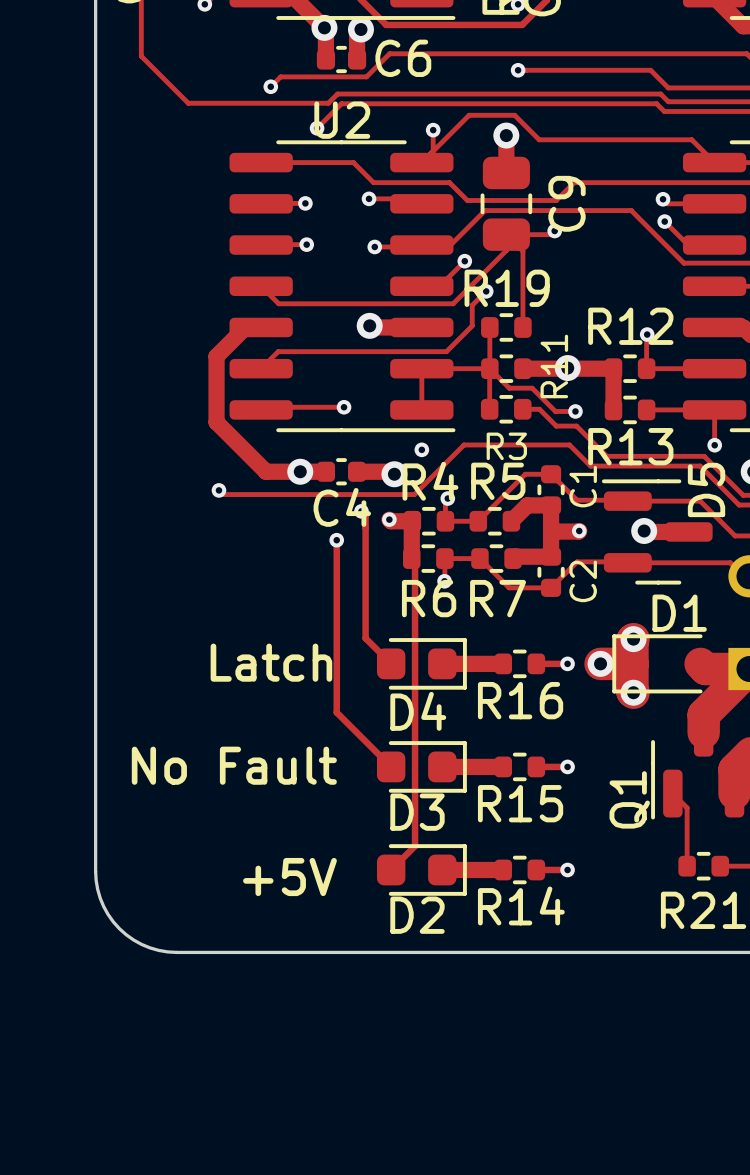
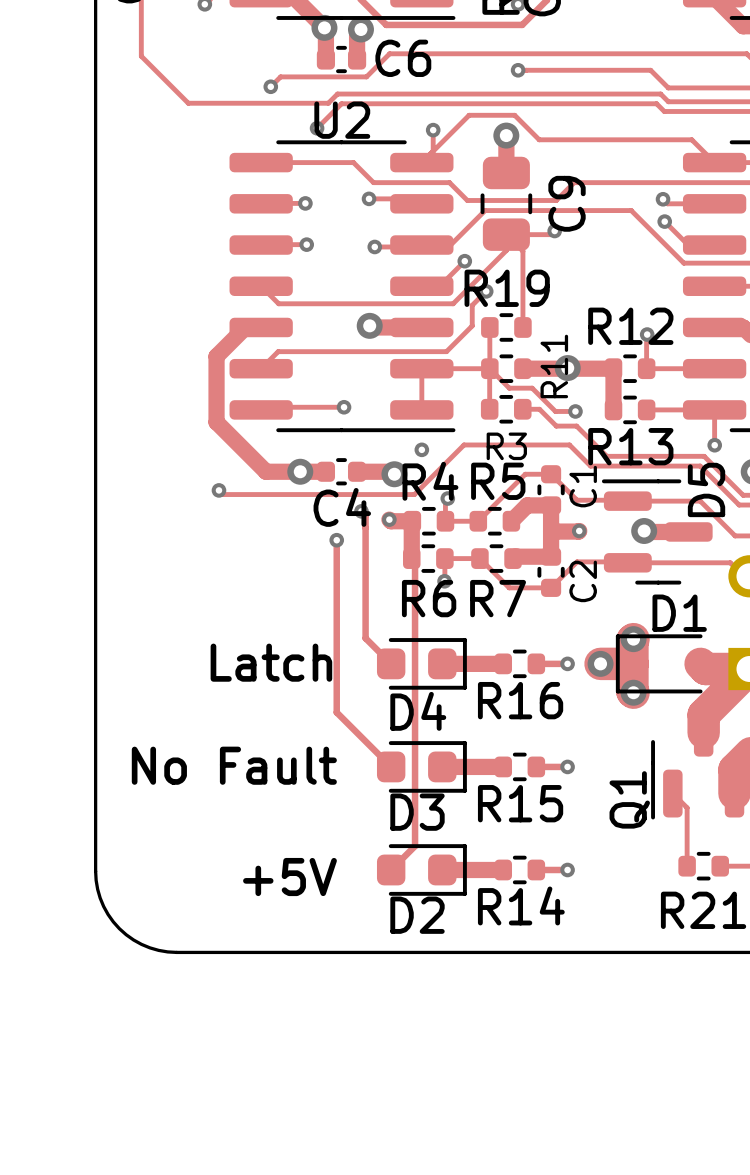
D5 footprint: [612, 634, 711, 694] -> [615, 634, 711, 694]

